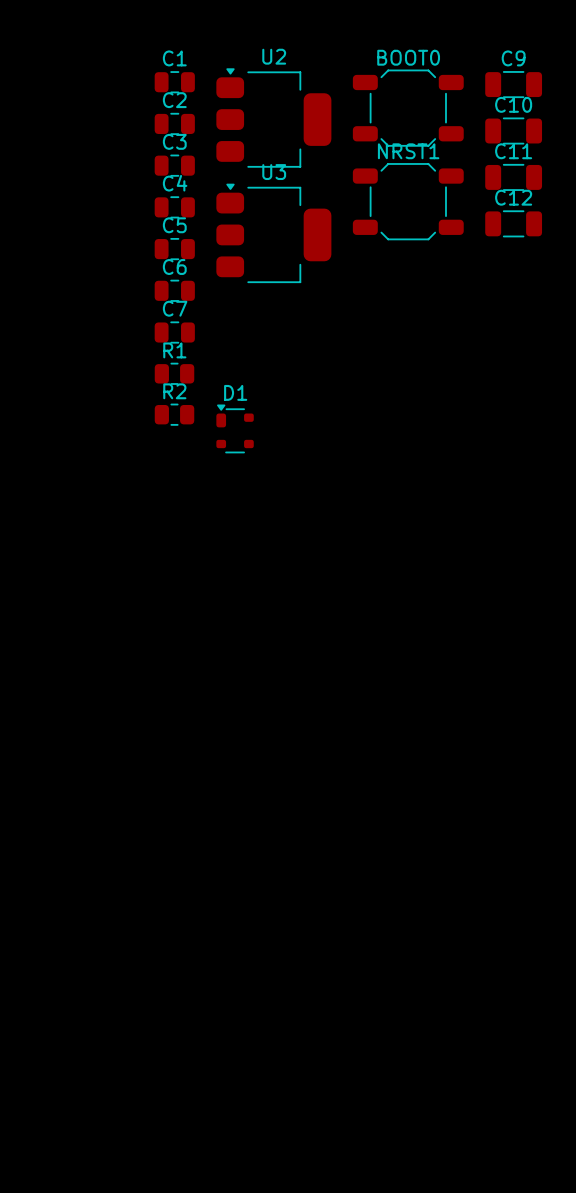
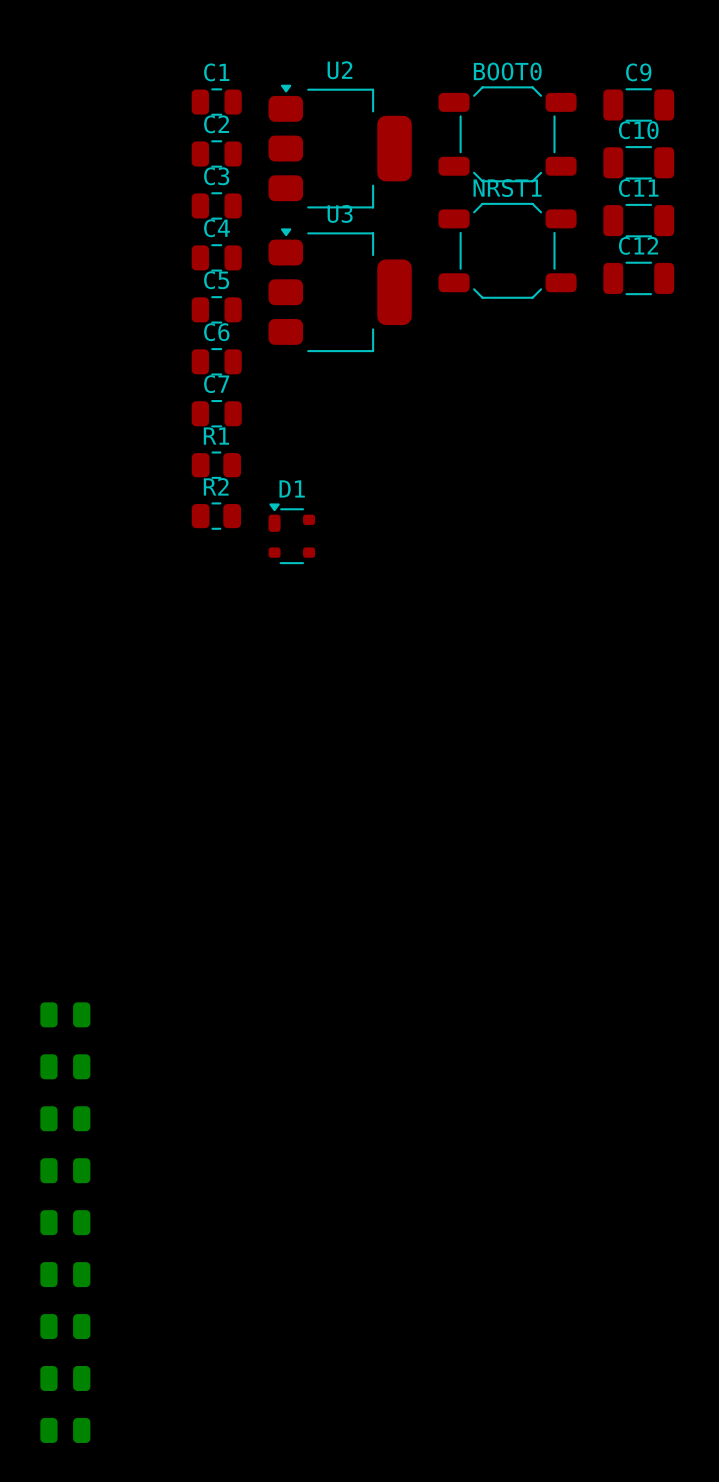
part: none -> (65, 1014)
part: none -> (65, 1066)
part: none -> (65, 1118)
part: none -> (65, 1170)
part: none -> (65, 1222)
part: none -> (65, 1274)
part: none -> (65, 1326)
part: none -> (65, 1378)
part: none -> (65, 1430)

